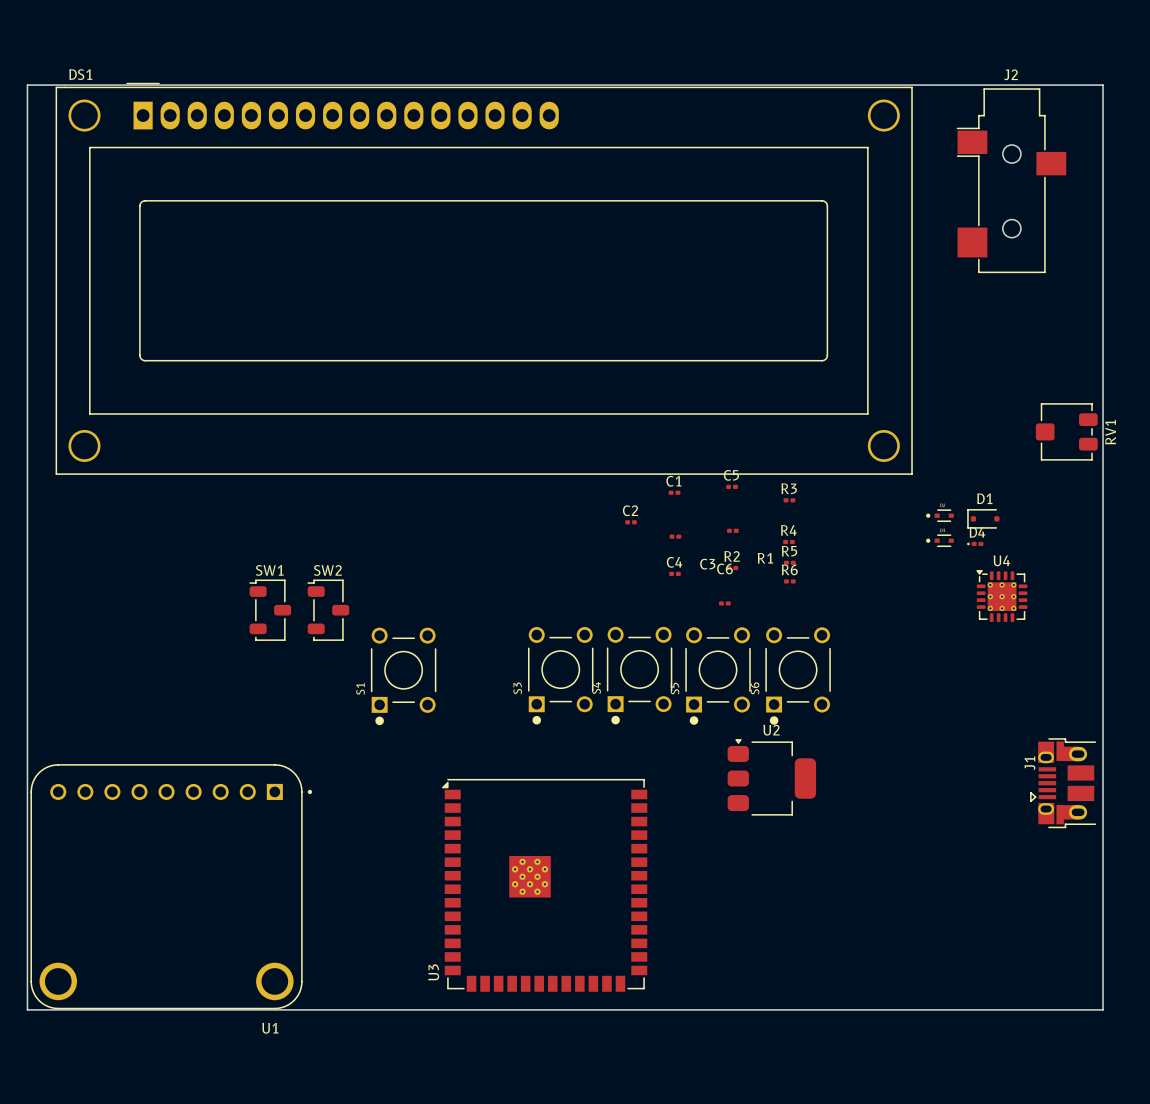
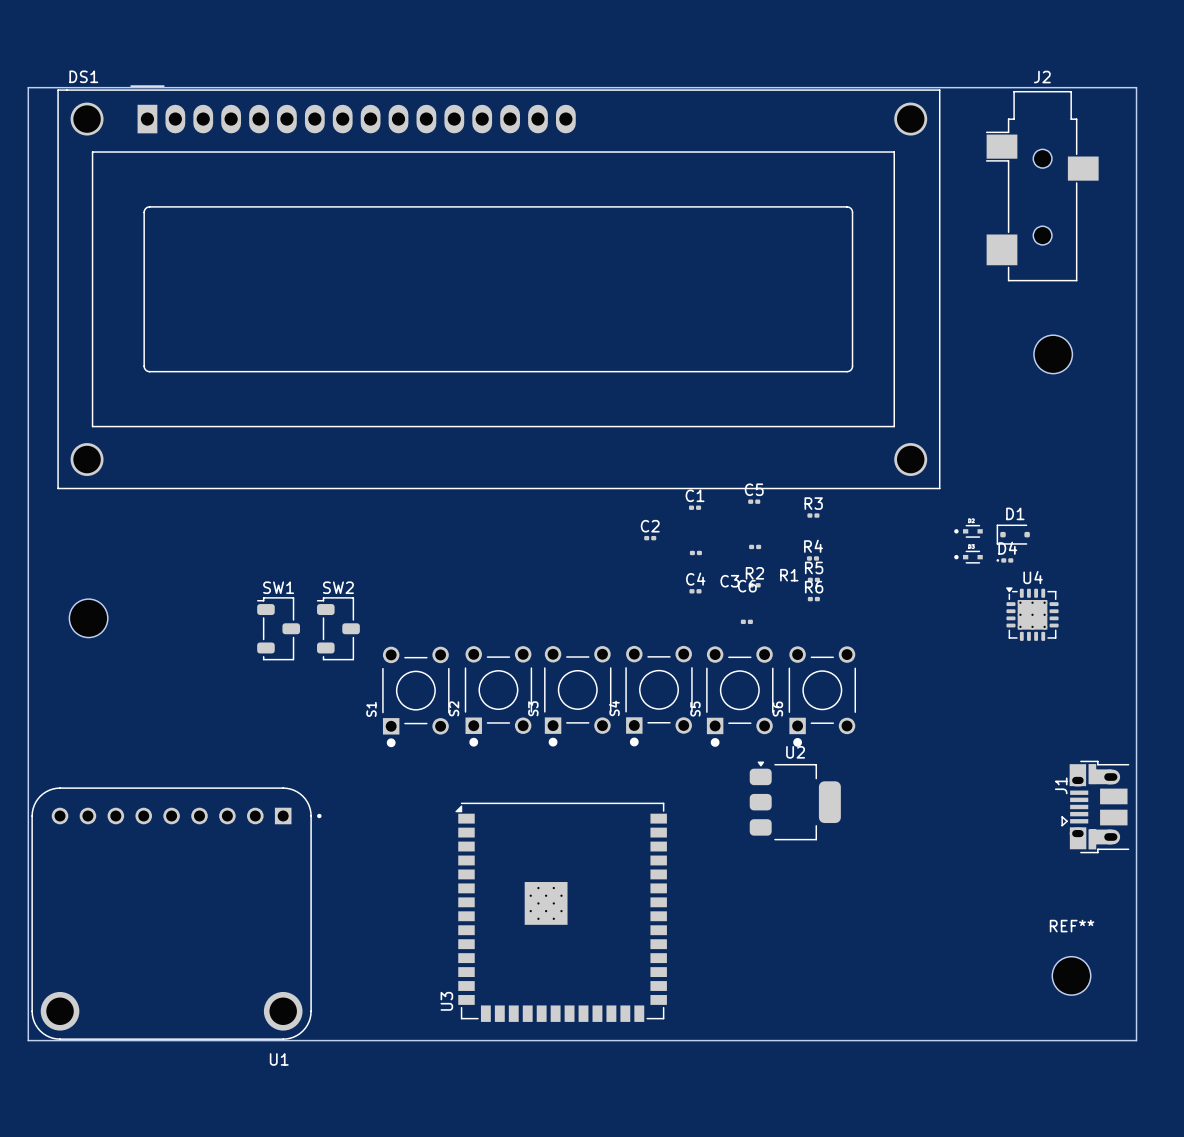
part: none -> (1053, 354)
RV1: (1066, 431) -> none
part: none -> (88, 618)
S2: none -> (498, 696)
REF**: none -> (1071, 975)

